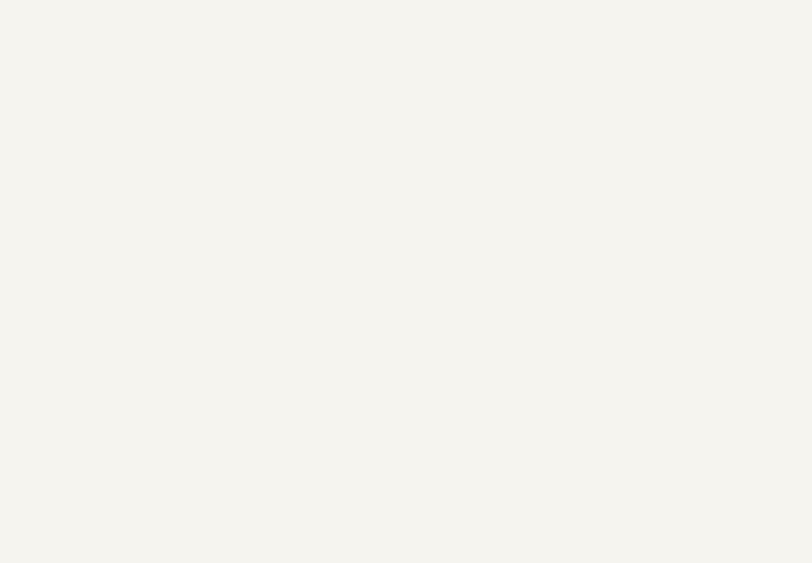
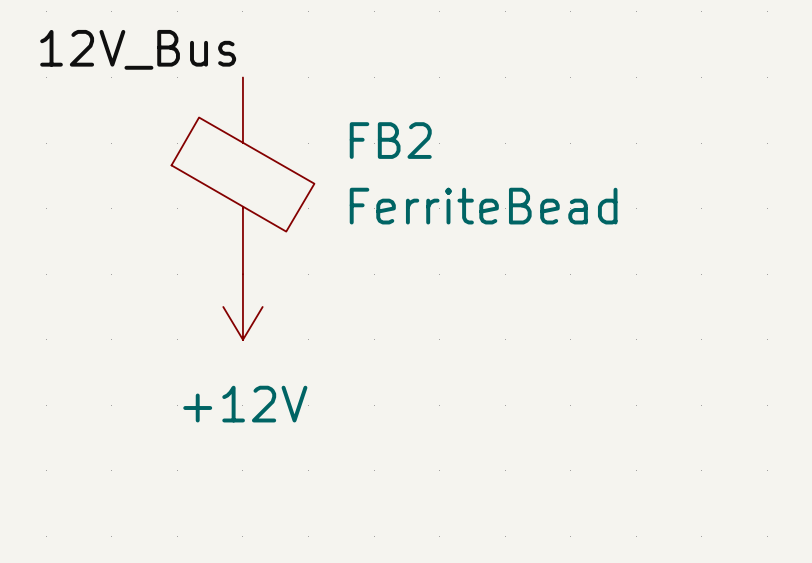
label: none -> 12V_Bus (138, 49)
FB2: none -> FerriteBead (242, 175)
power symbol: none -> +12V (242, 306)

